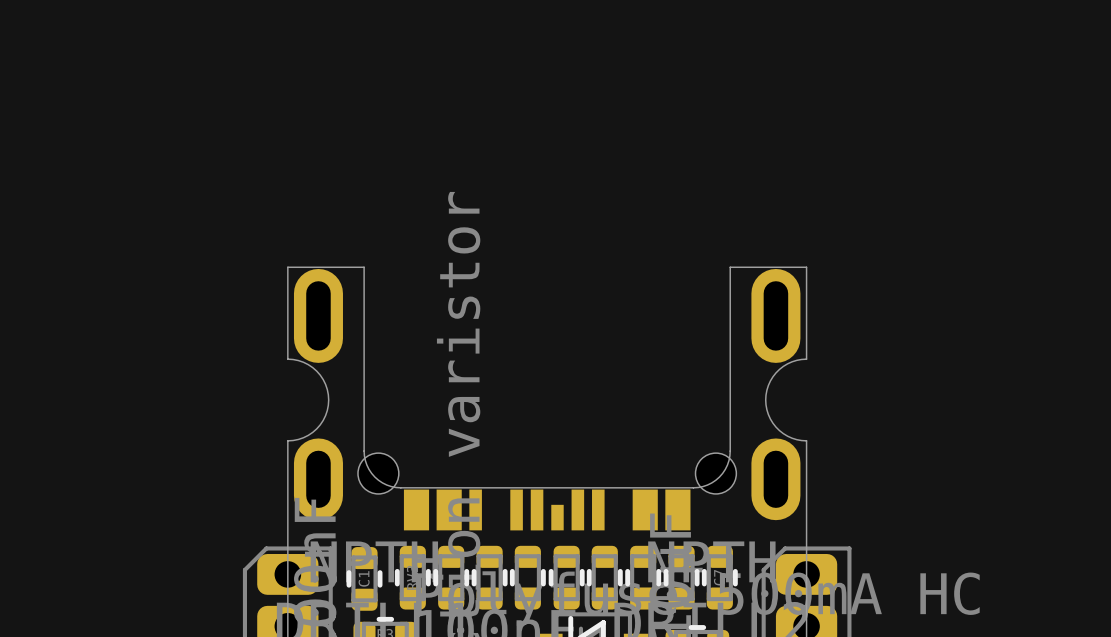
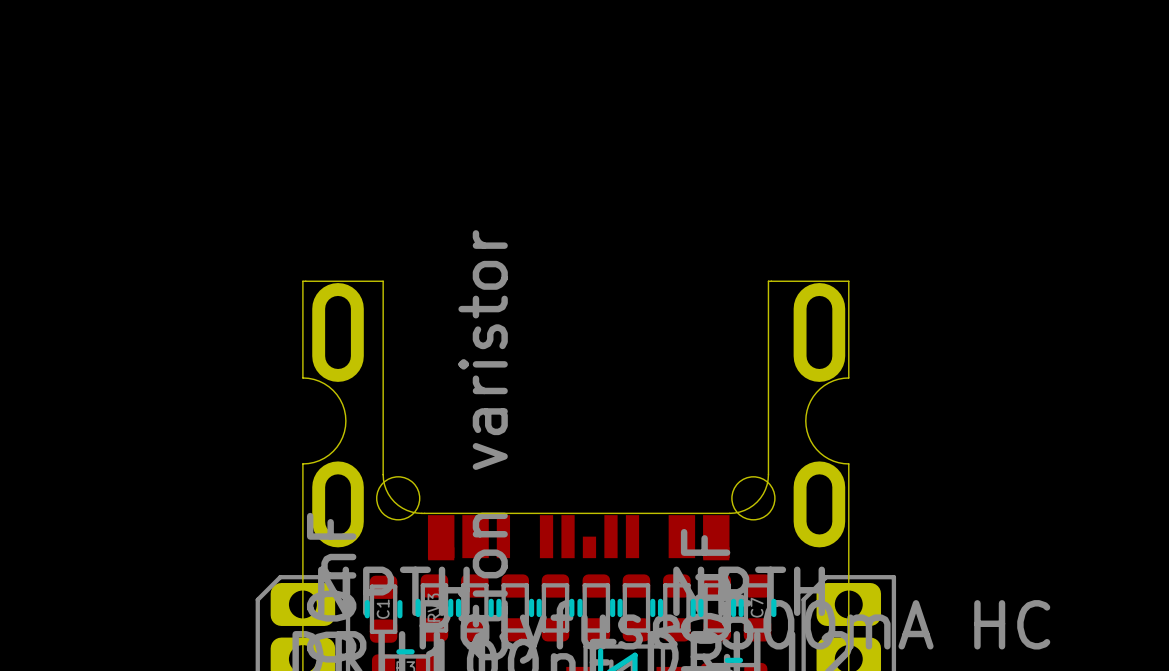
part footprint: [293, 268, 801, 531] -> [312, 283, 846, 561]

